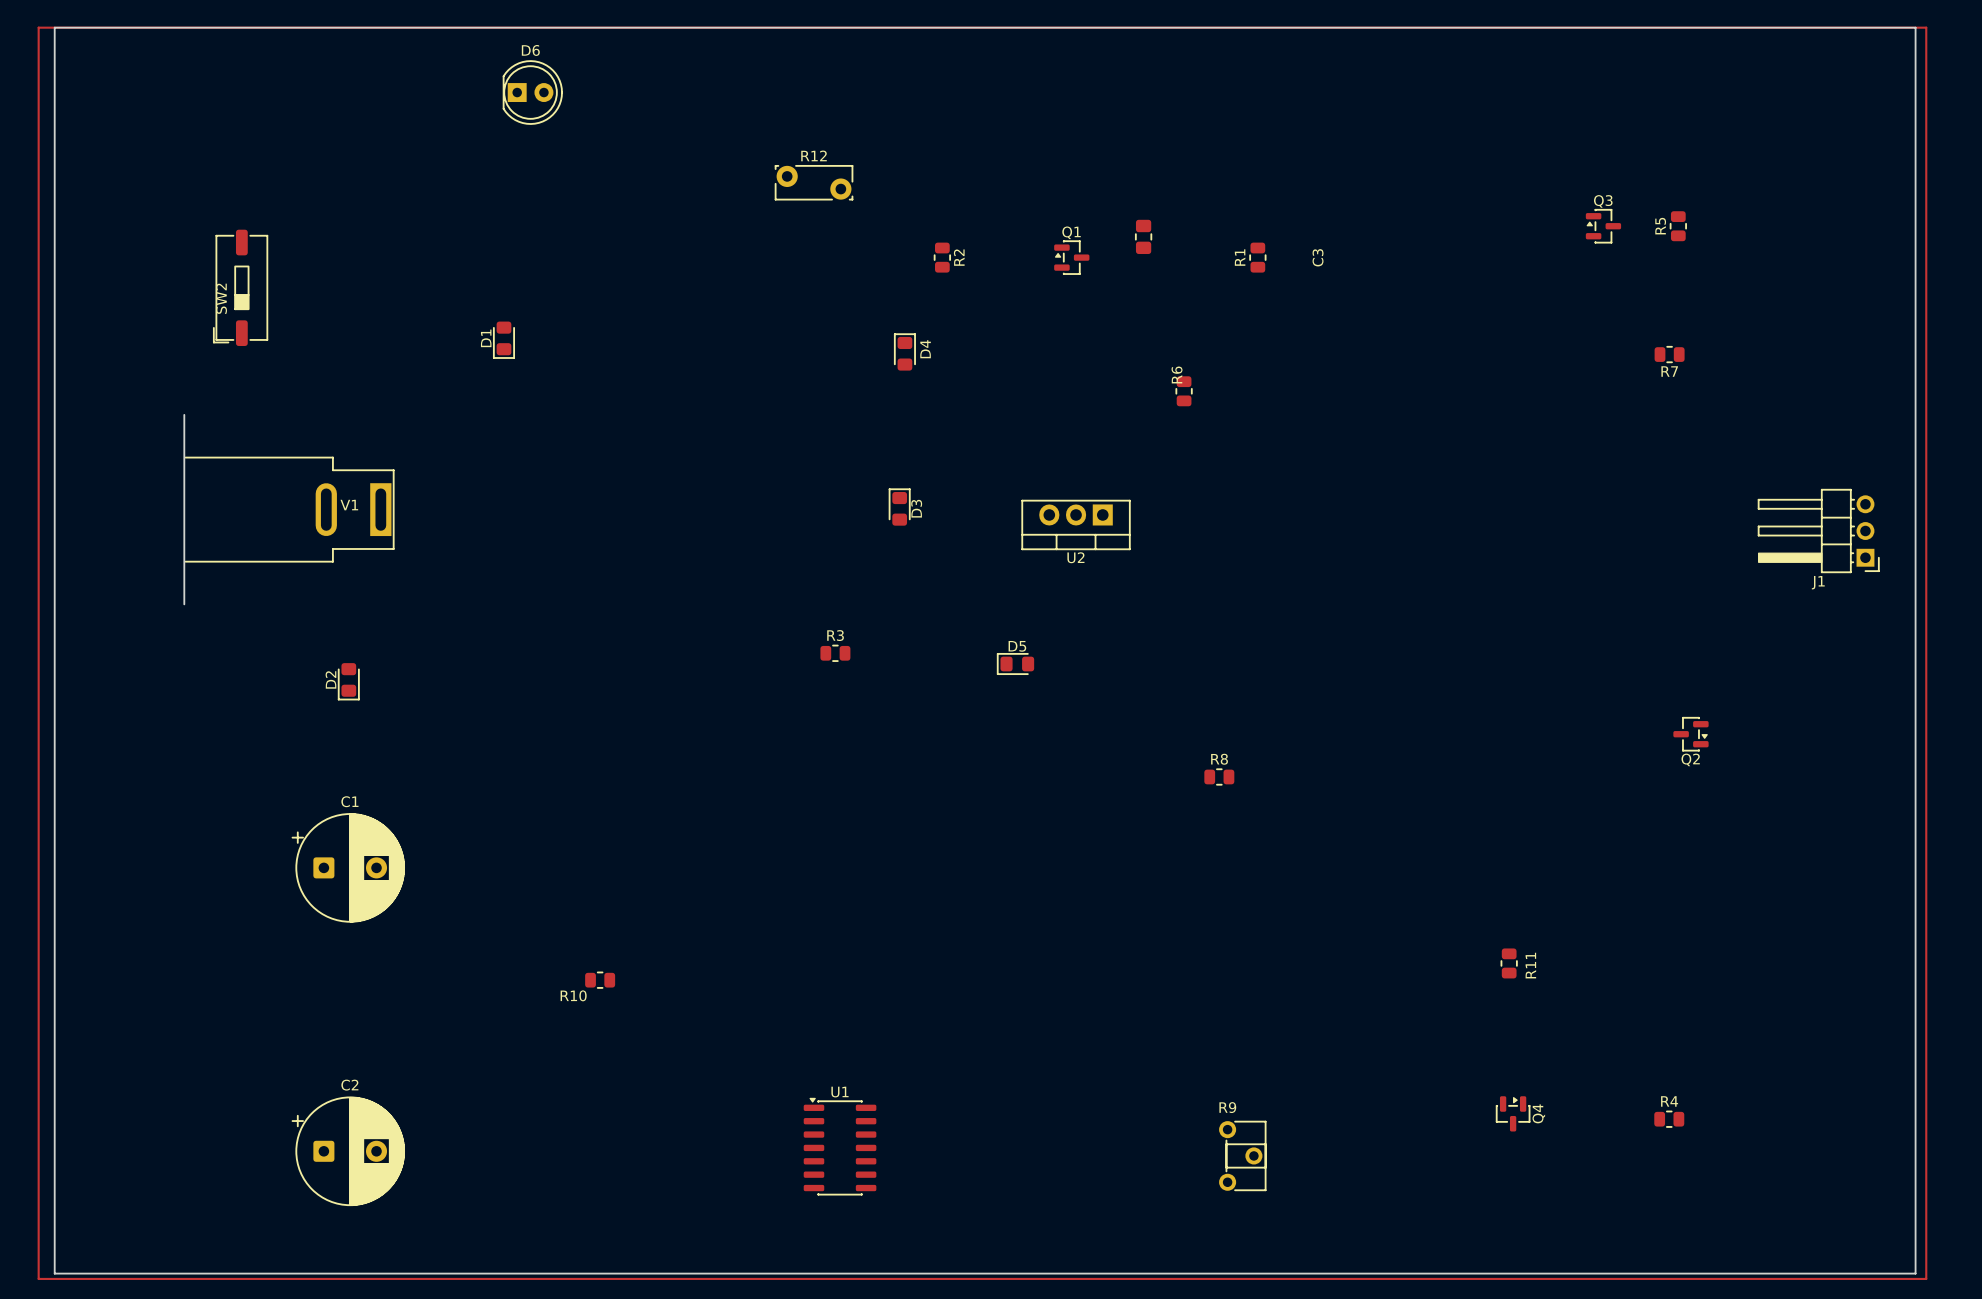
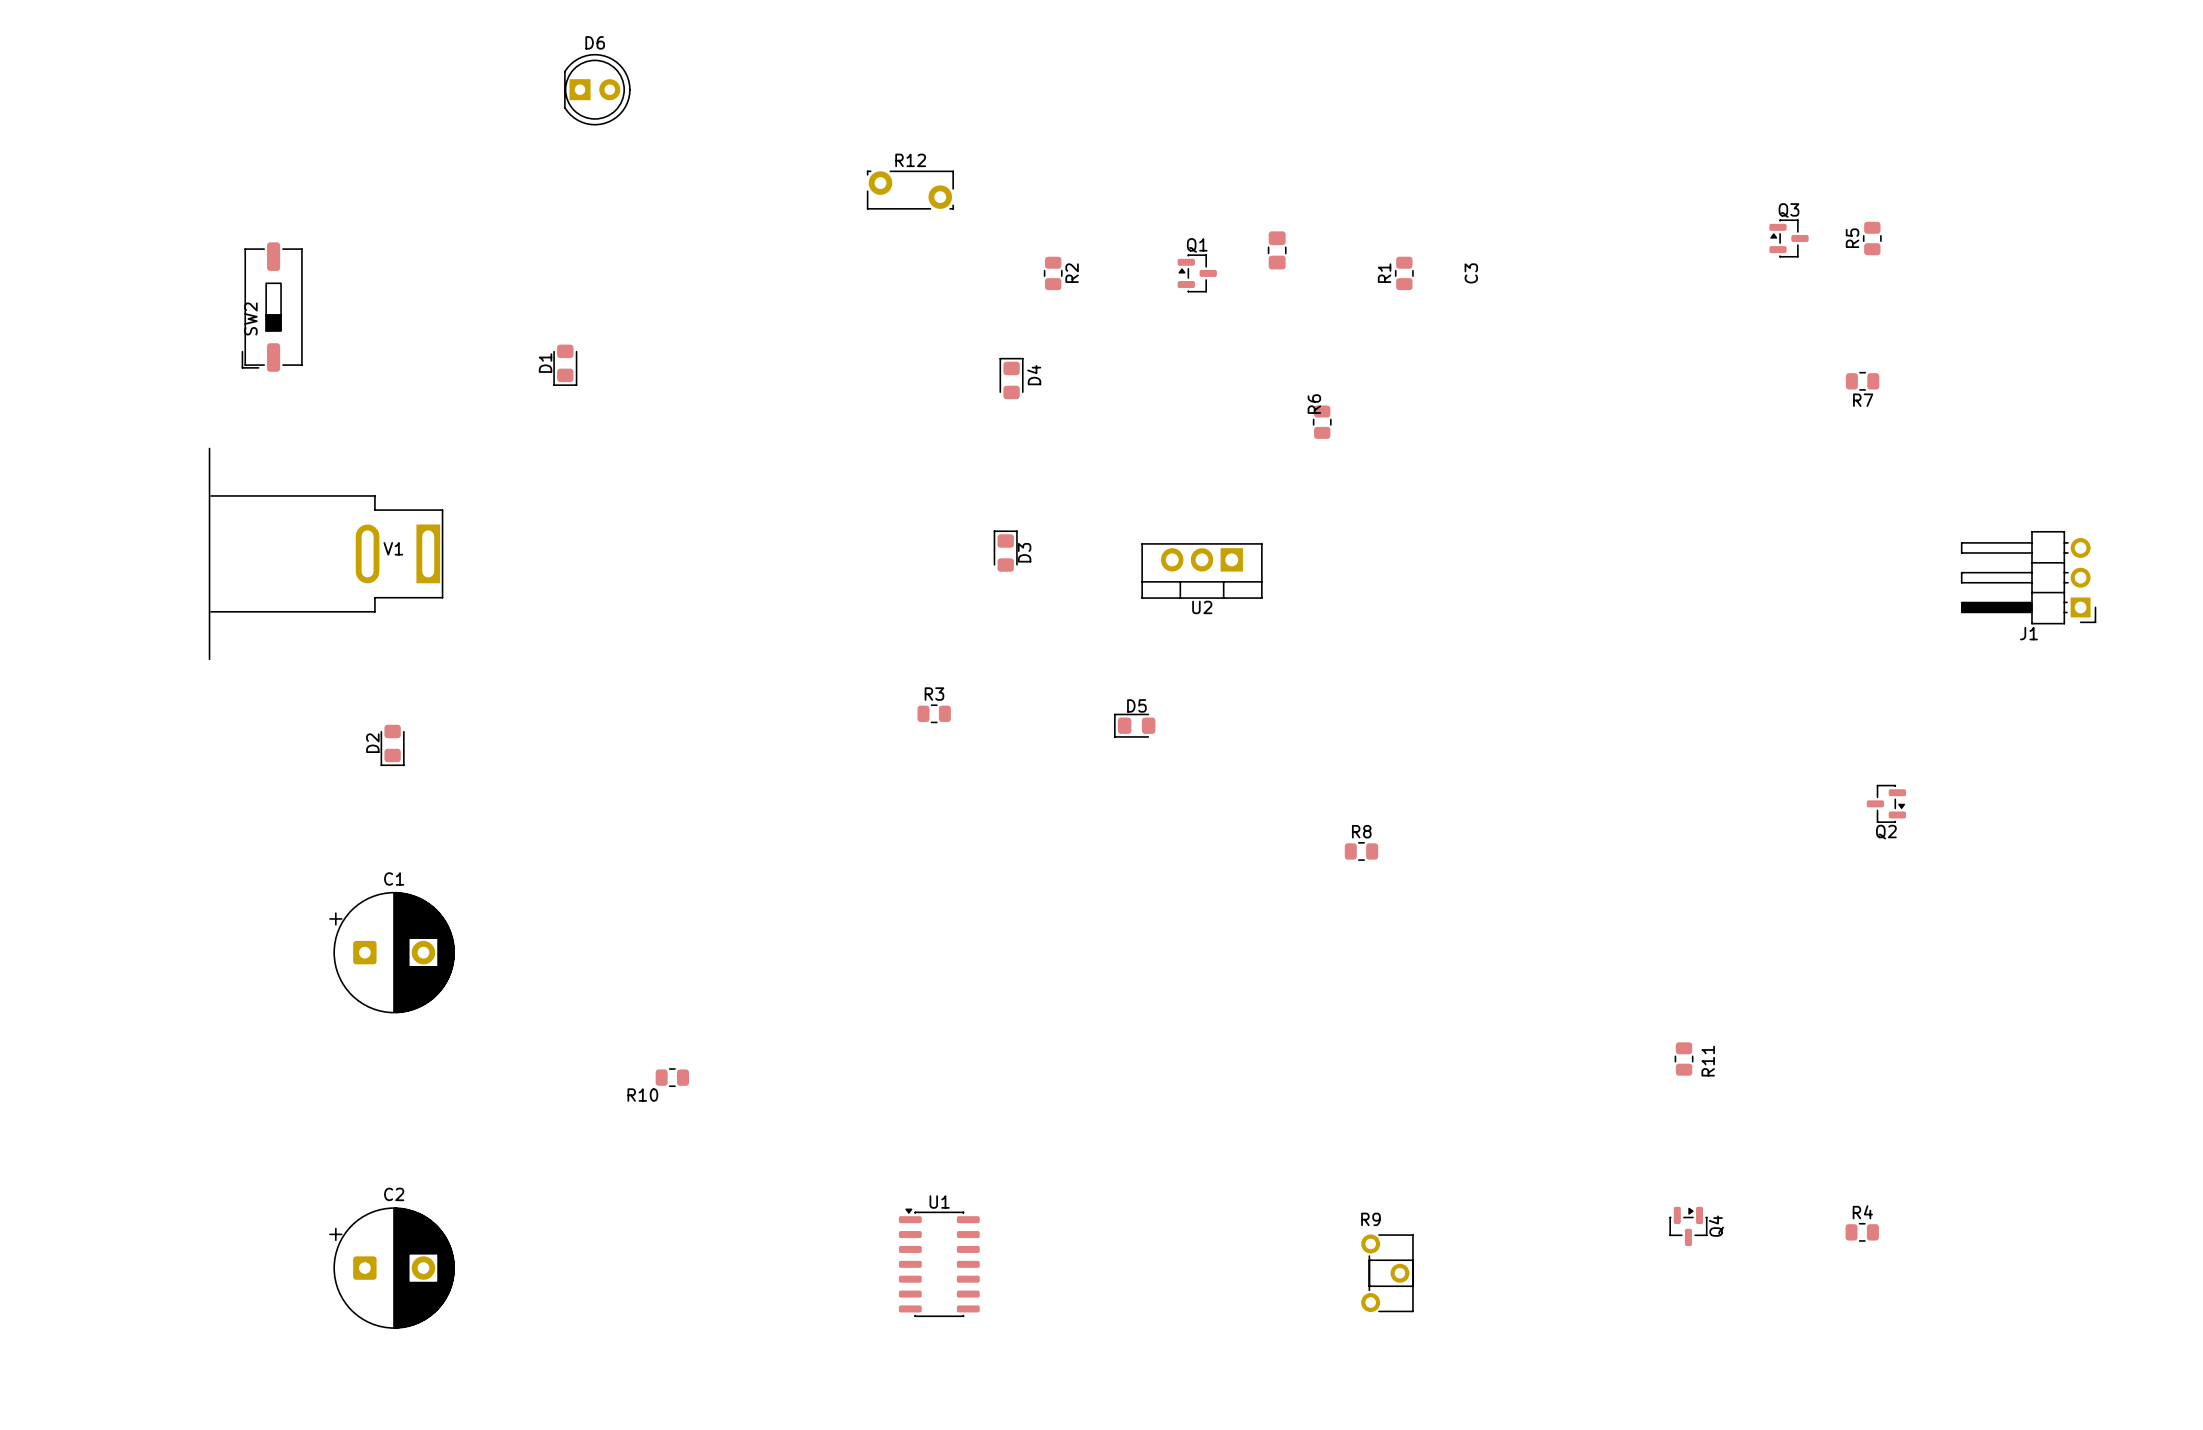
track: (38, 27) (1926, 27) (1926, 1278) (38, 1278) (38, 27) -> none
board edge: (54, 27) (1915, 27) (1915, 1273) (54, 1273) (54, 27) -> none

